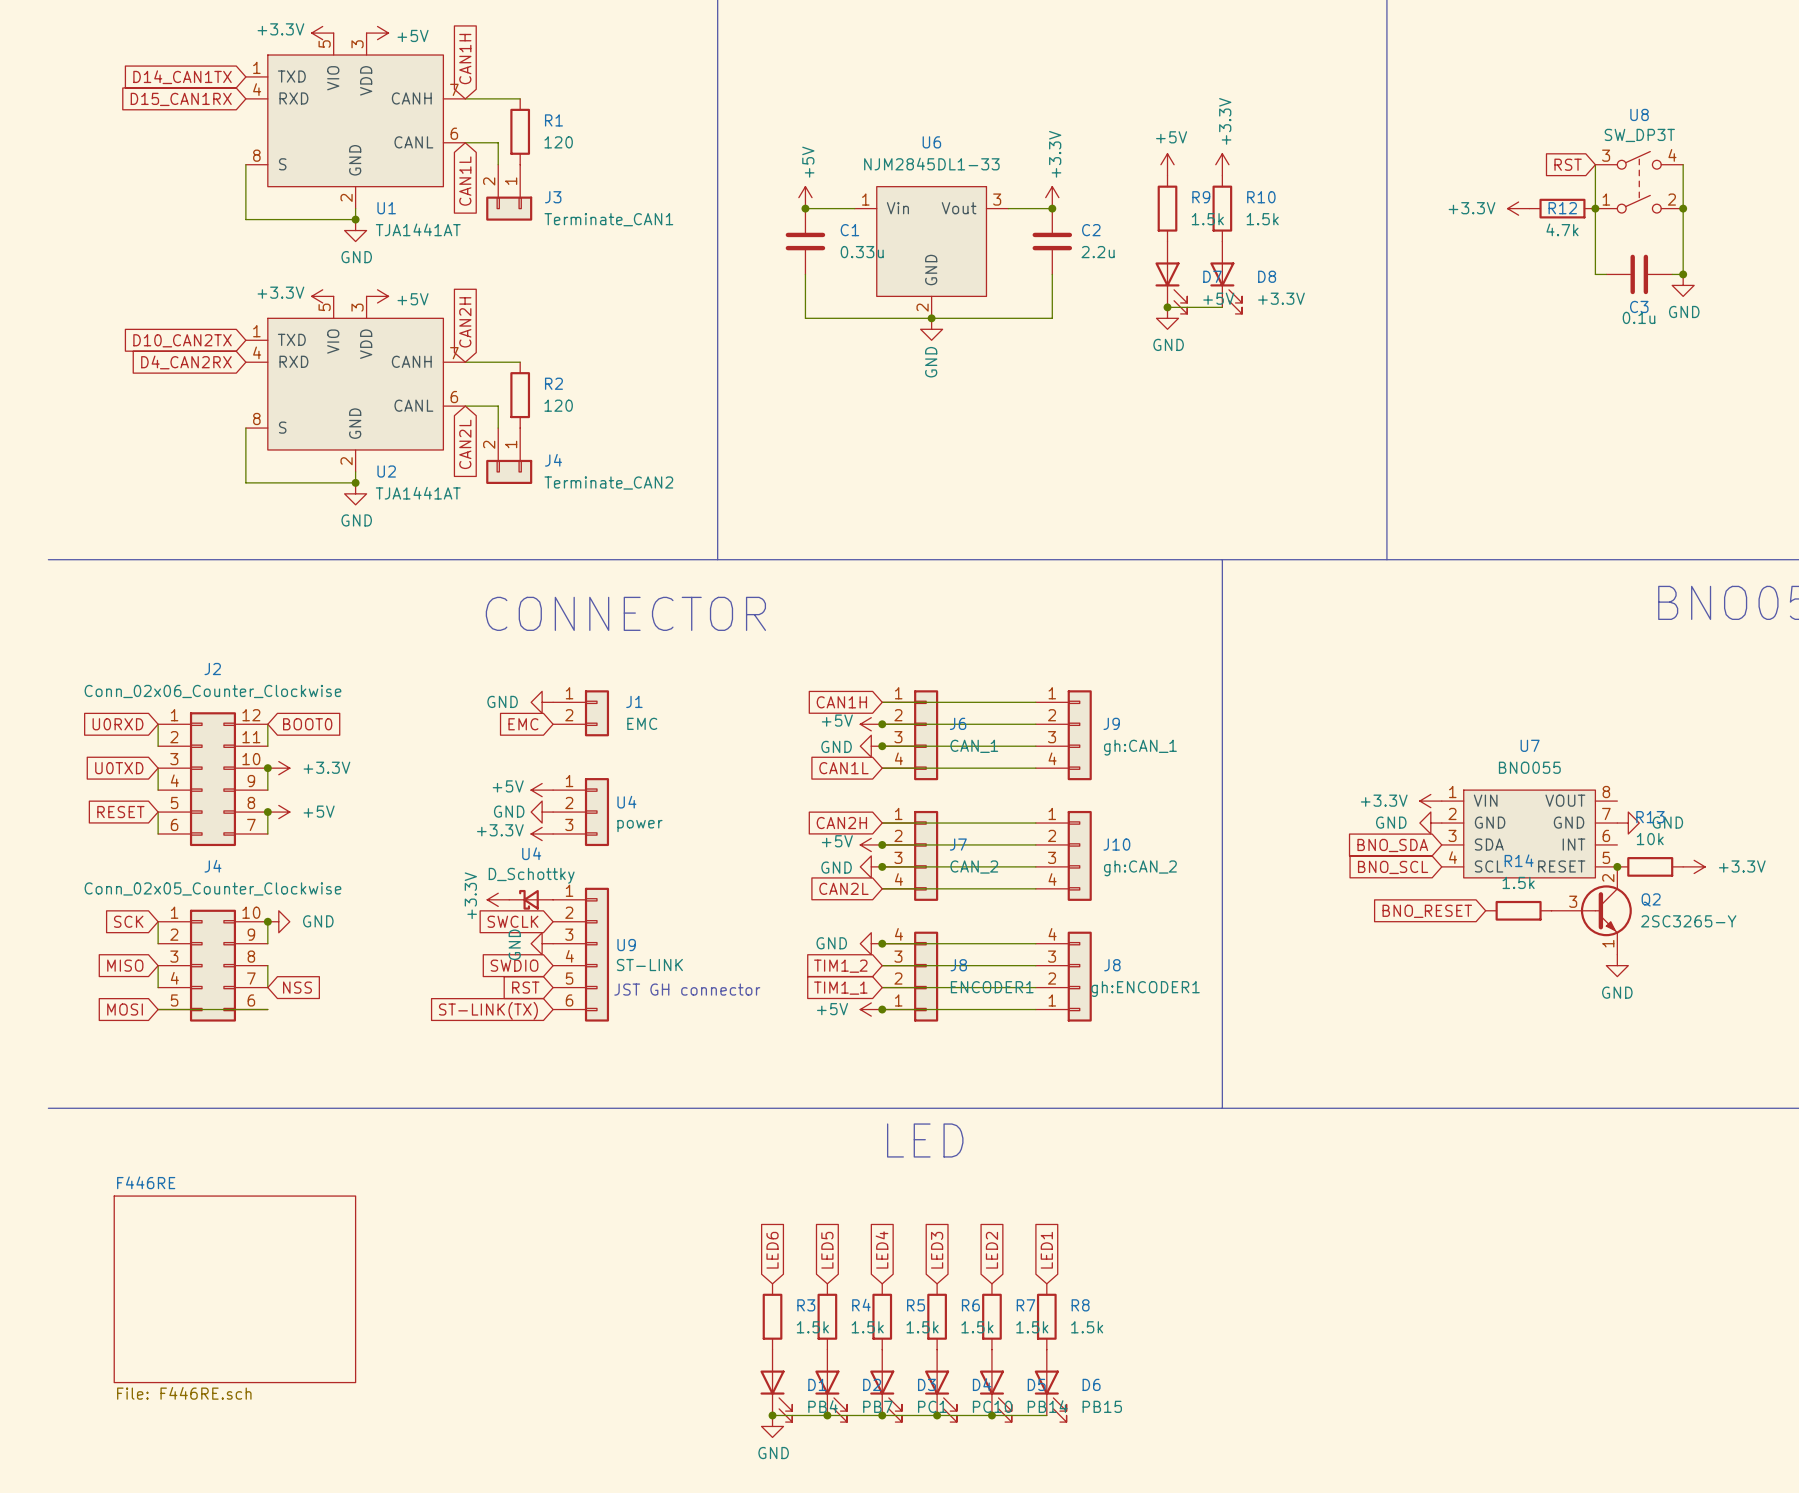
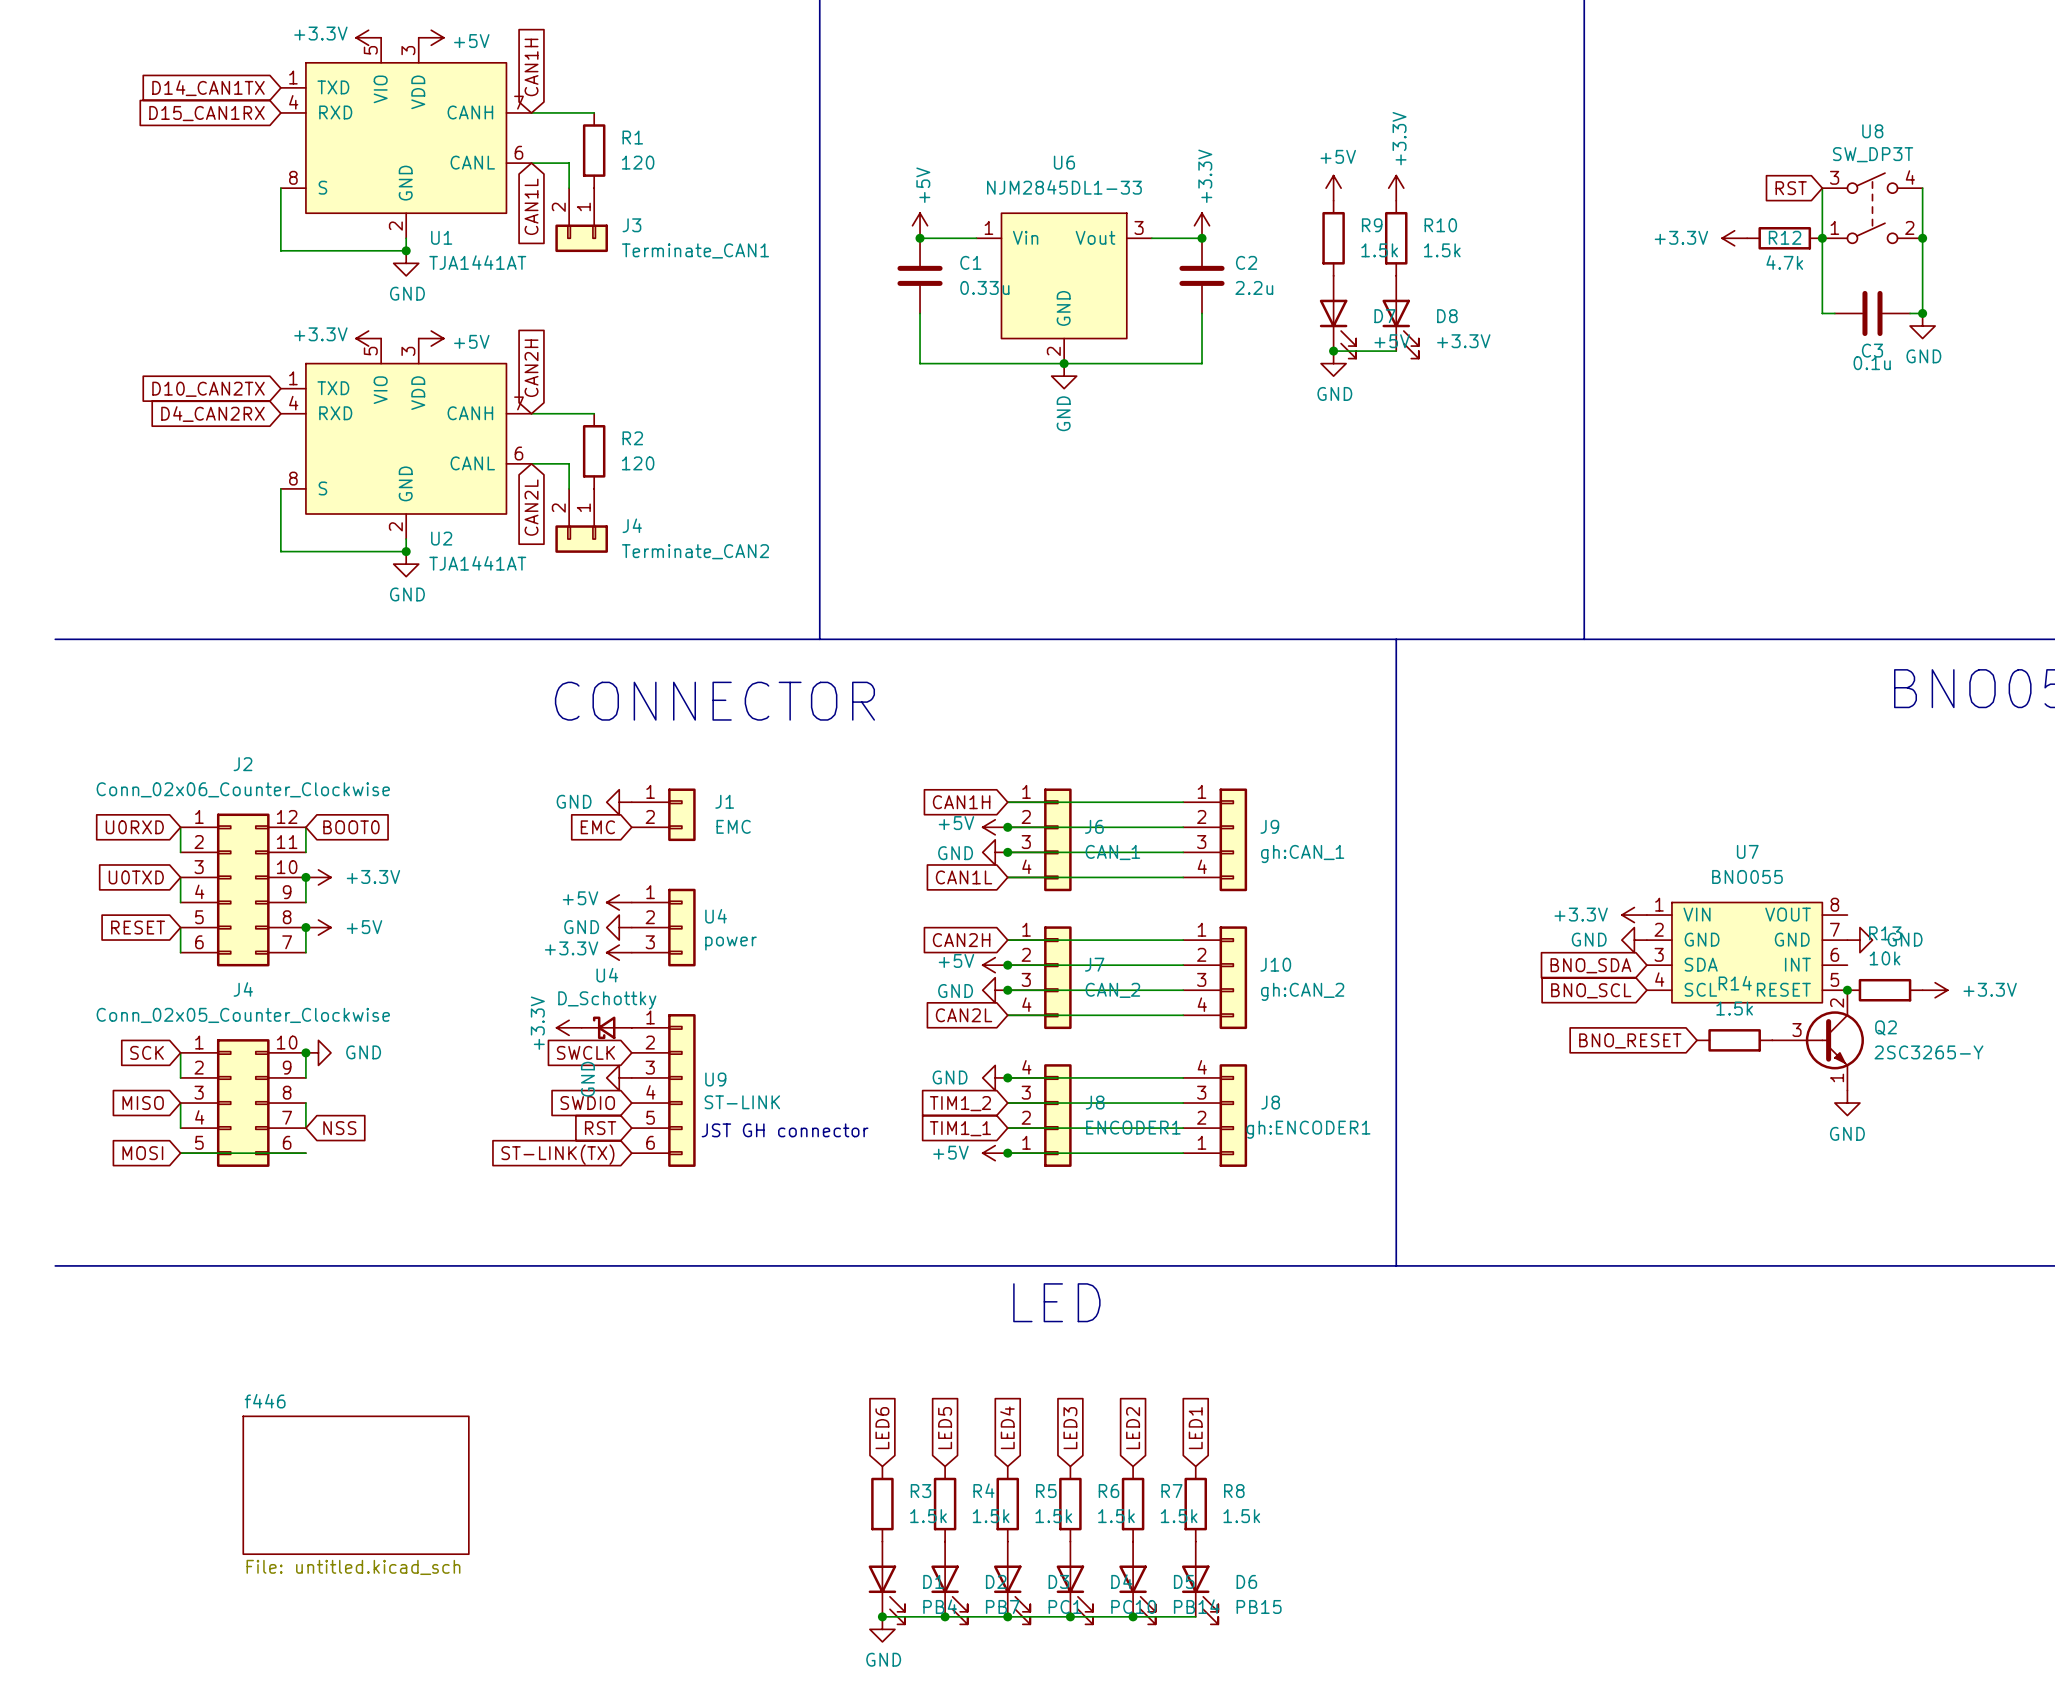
sheet F446RE: File: F446RE.sch (234, 1289) -> none
sheet f446: none -> File: untitled.kicad_sch (356, 1485)

